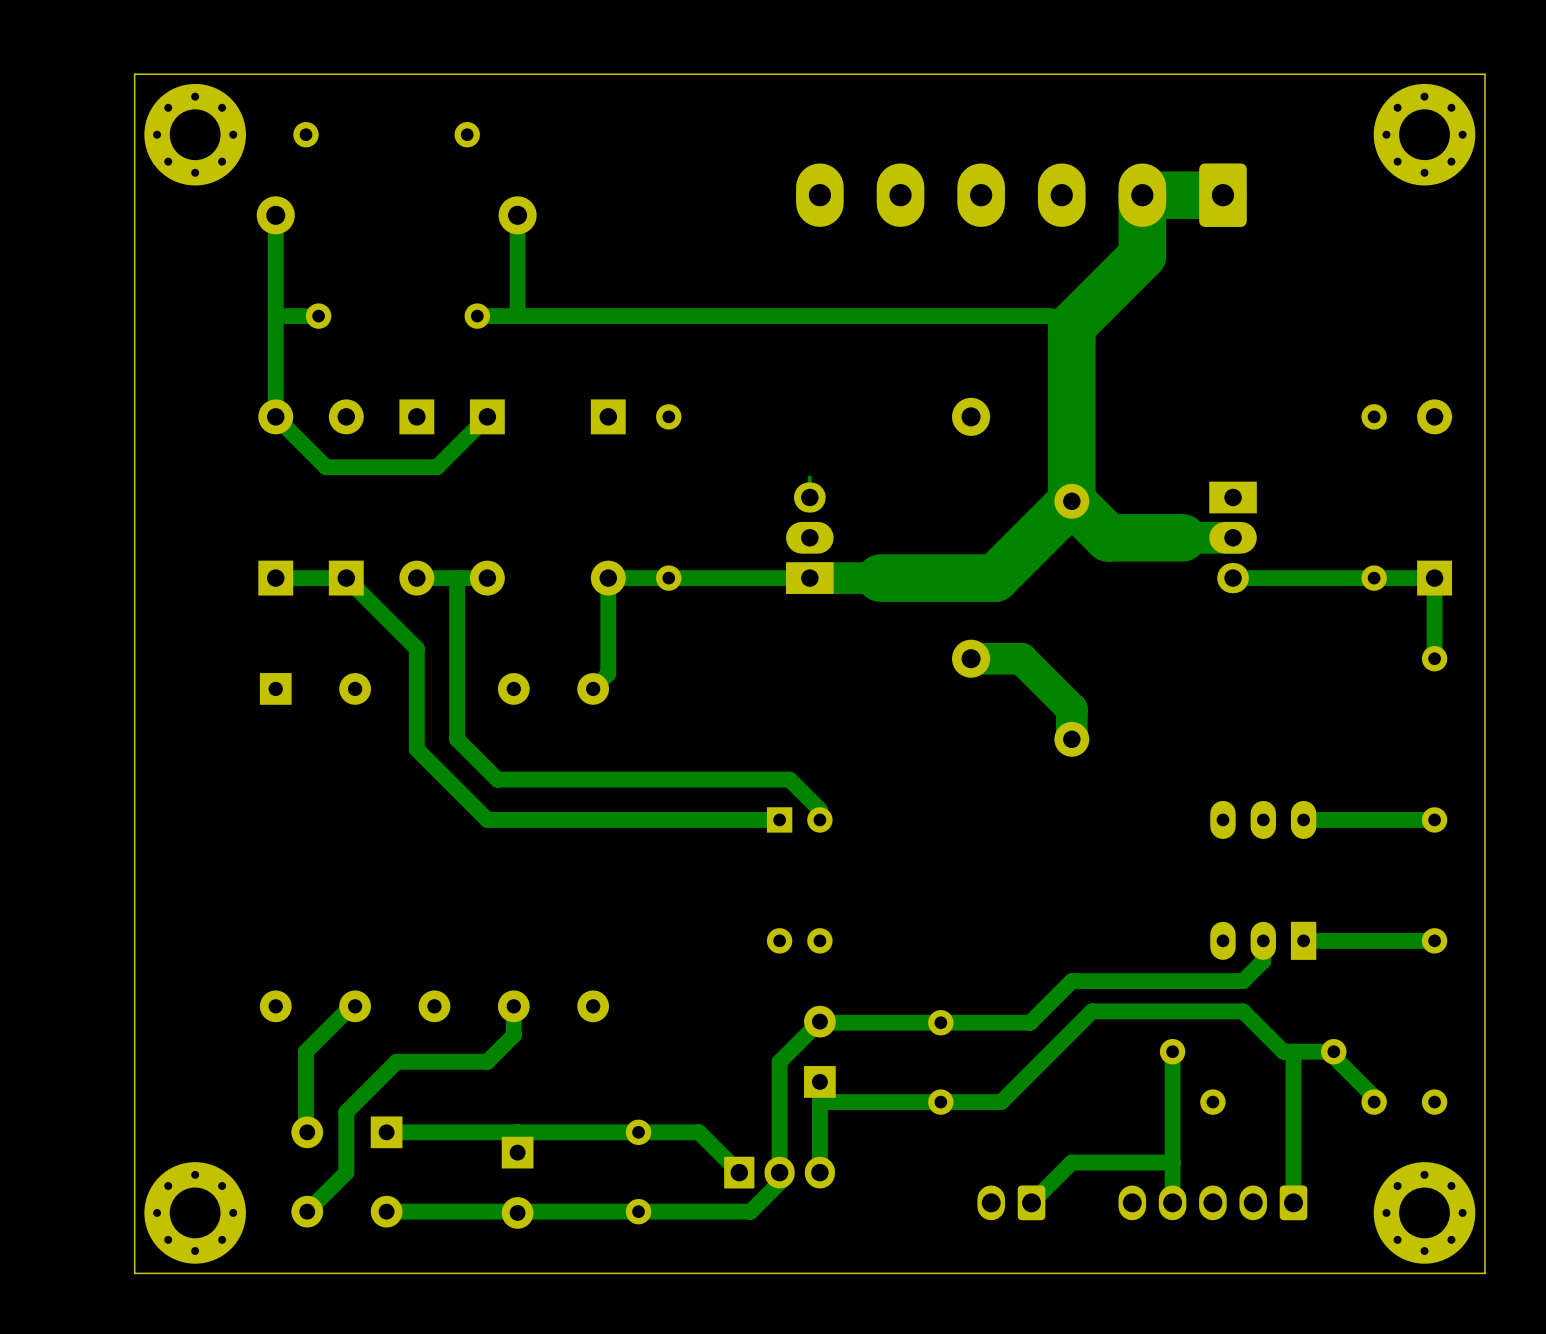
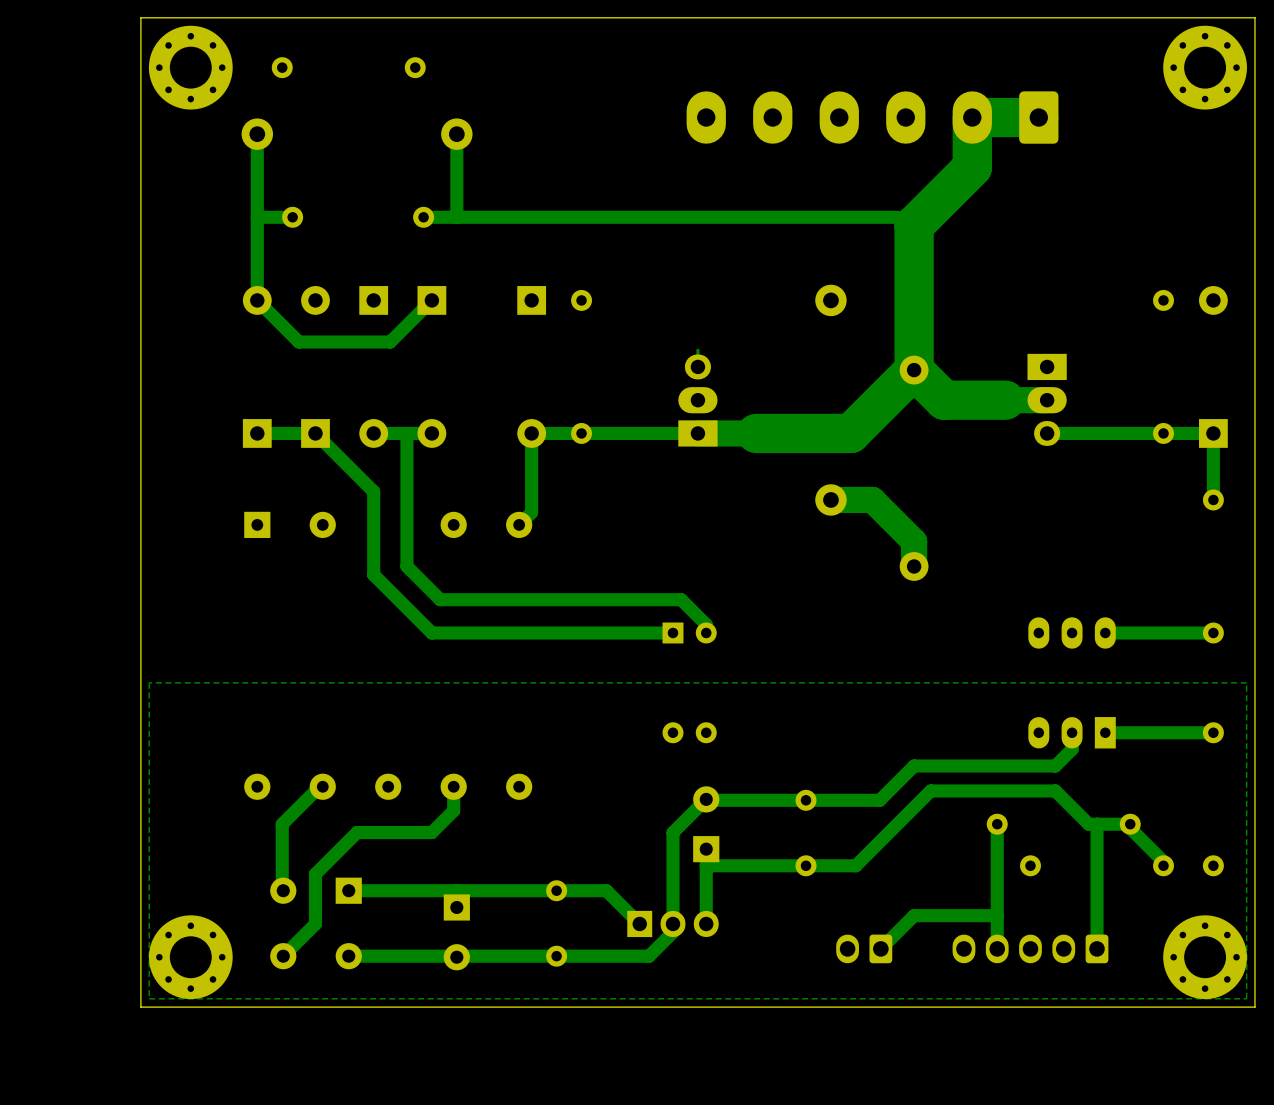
zone outline: none -> (1246, 682) (1246, 998) (149, 998) (149, 682) (1246, 682)

